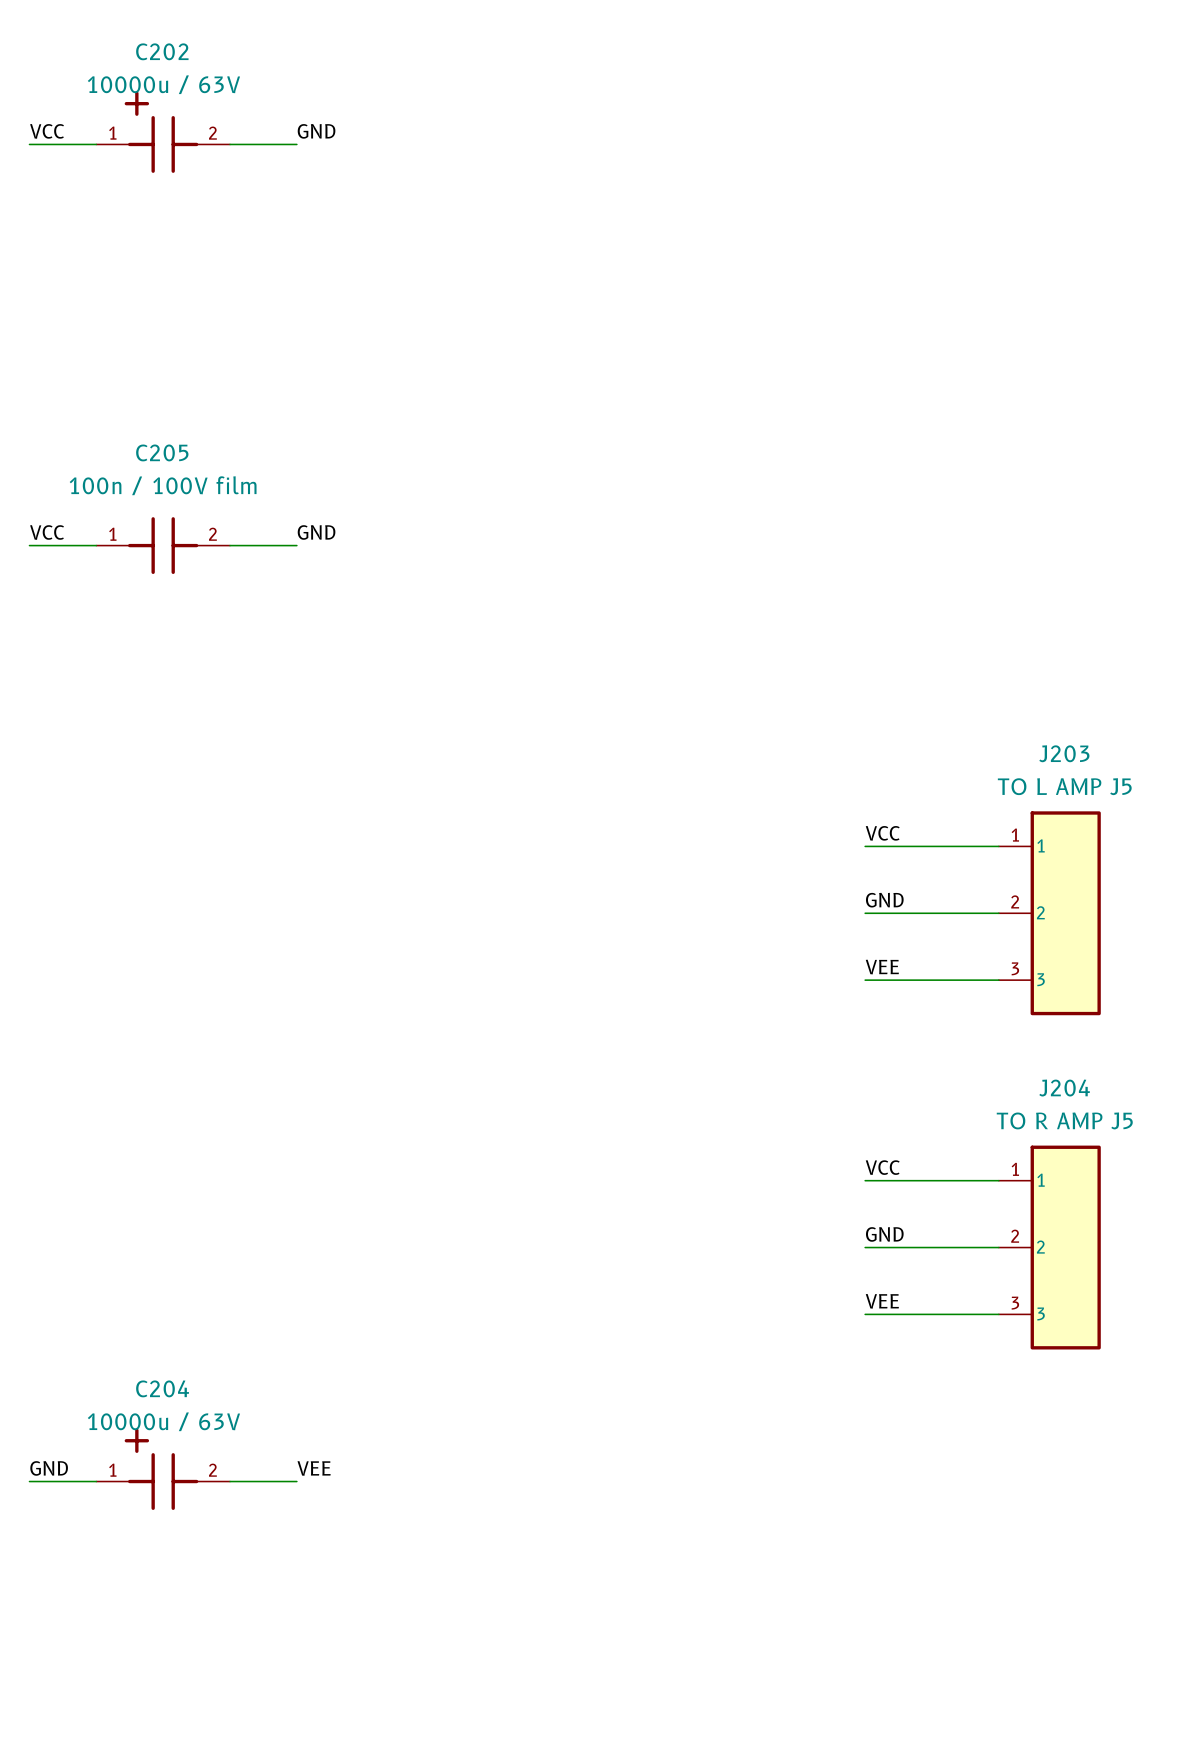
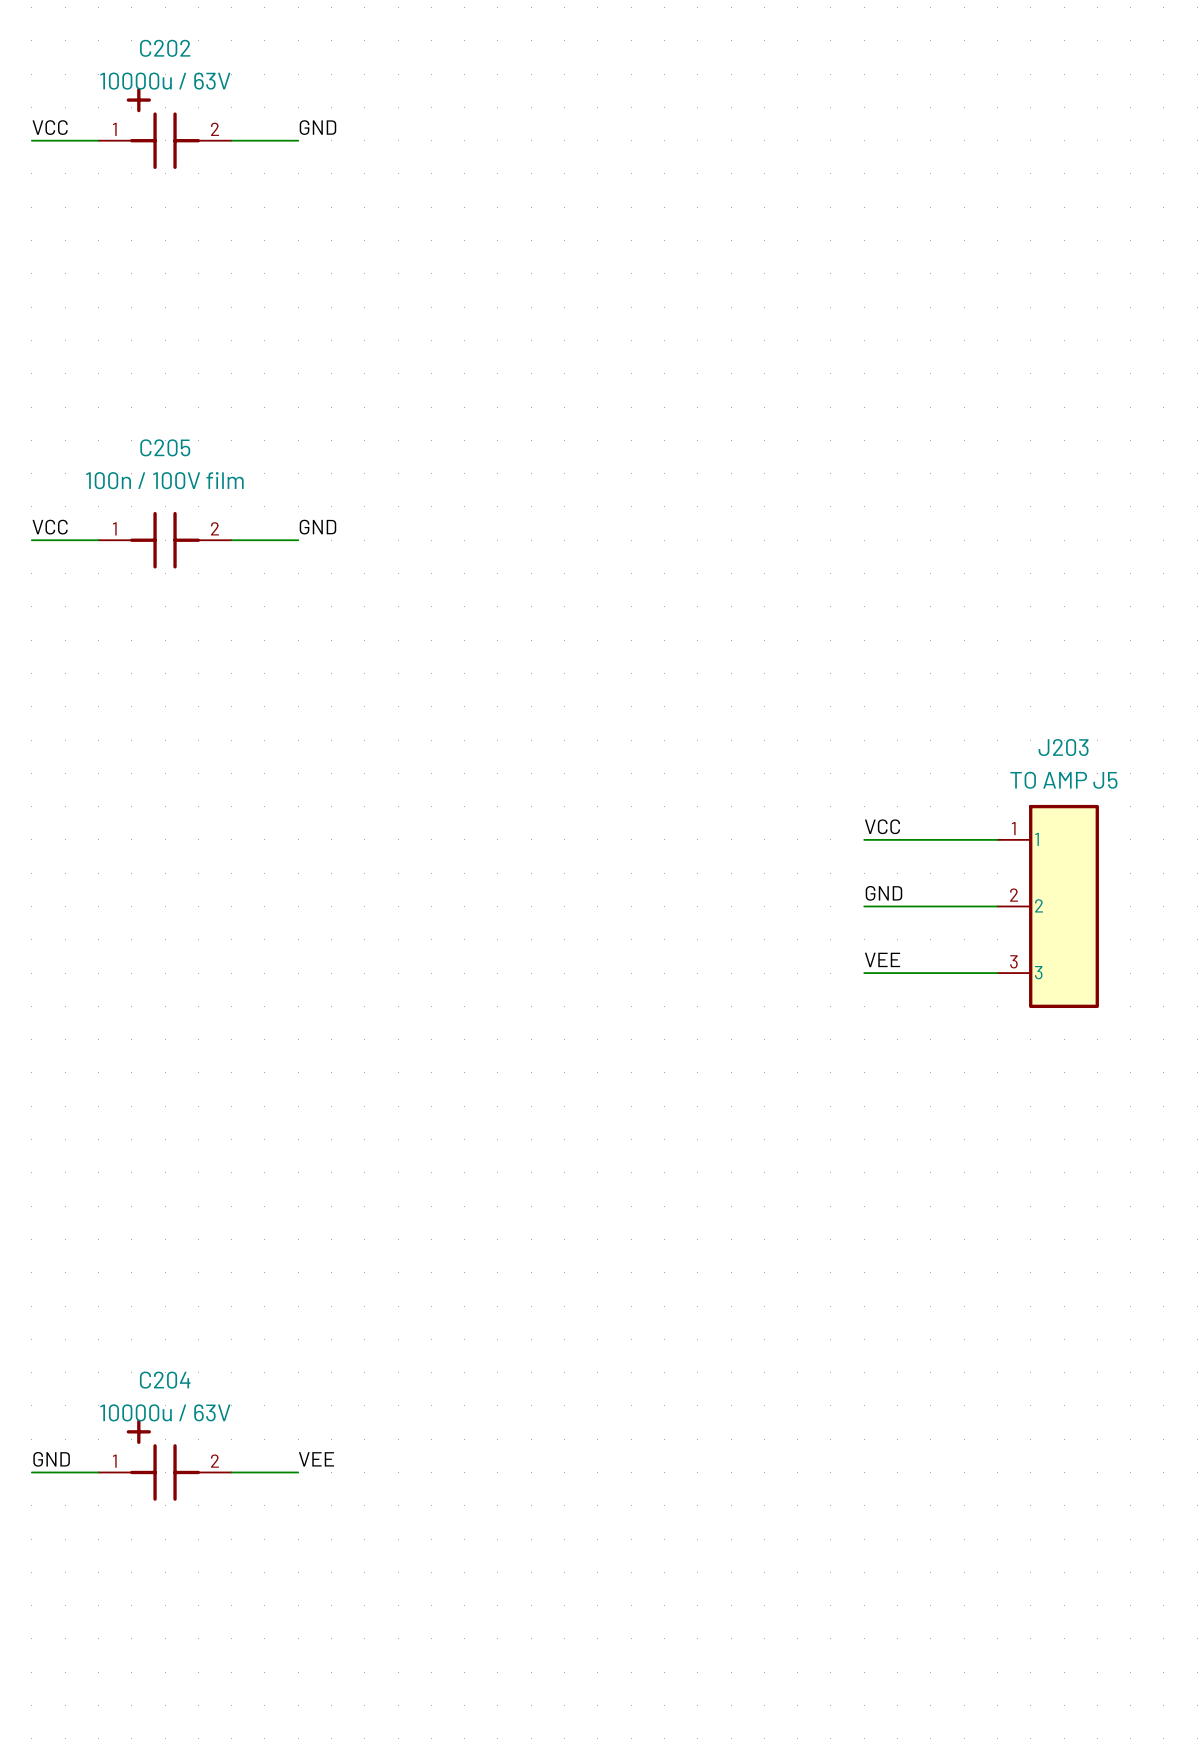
J203 value: TO L AMP J5 (1064, 786) -> TO AMP J5 (1063, 780)
label: VCC (882, 1167) -> none
wire: (865, 1180) (998, 1180) -> none
label: GND (884, 1234) -> none
wire: (865, 1247) (998, 1247) -> none
J204: TO R AMP J5 (1049, 1247) -> none
label: VEE (882, 1301) -> none
wire: (865, 1314) (998, 1314) -> none

